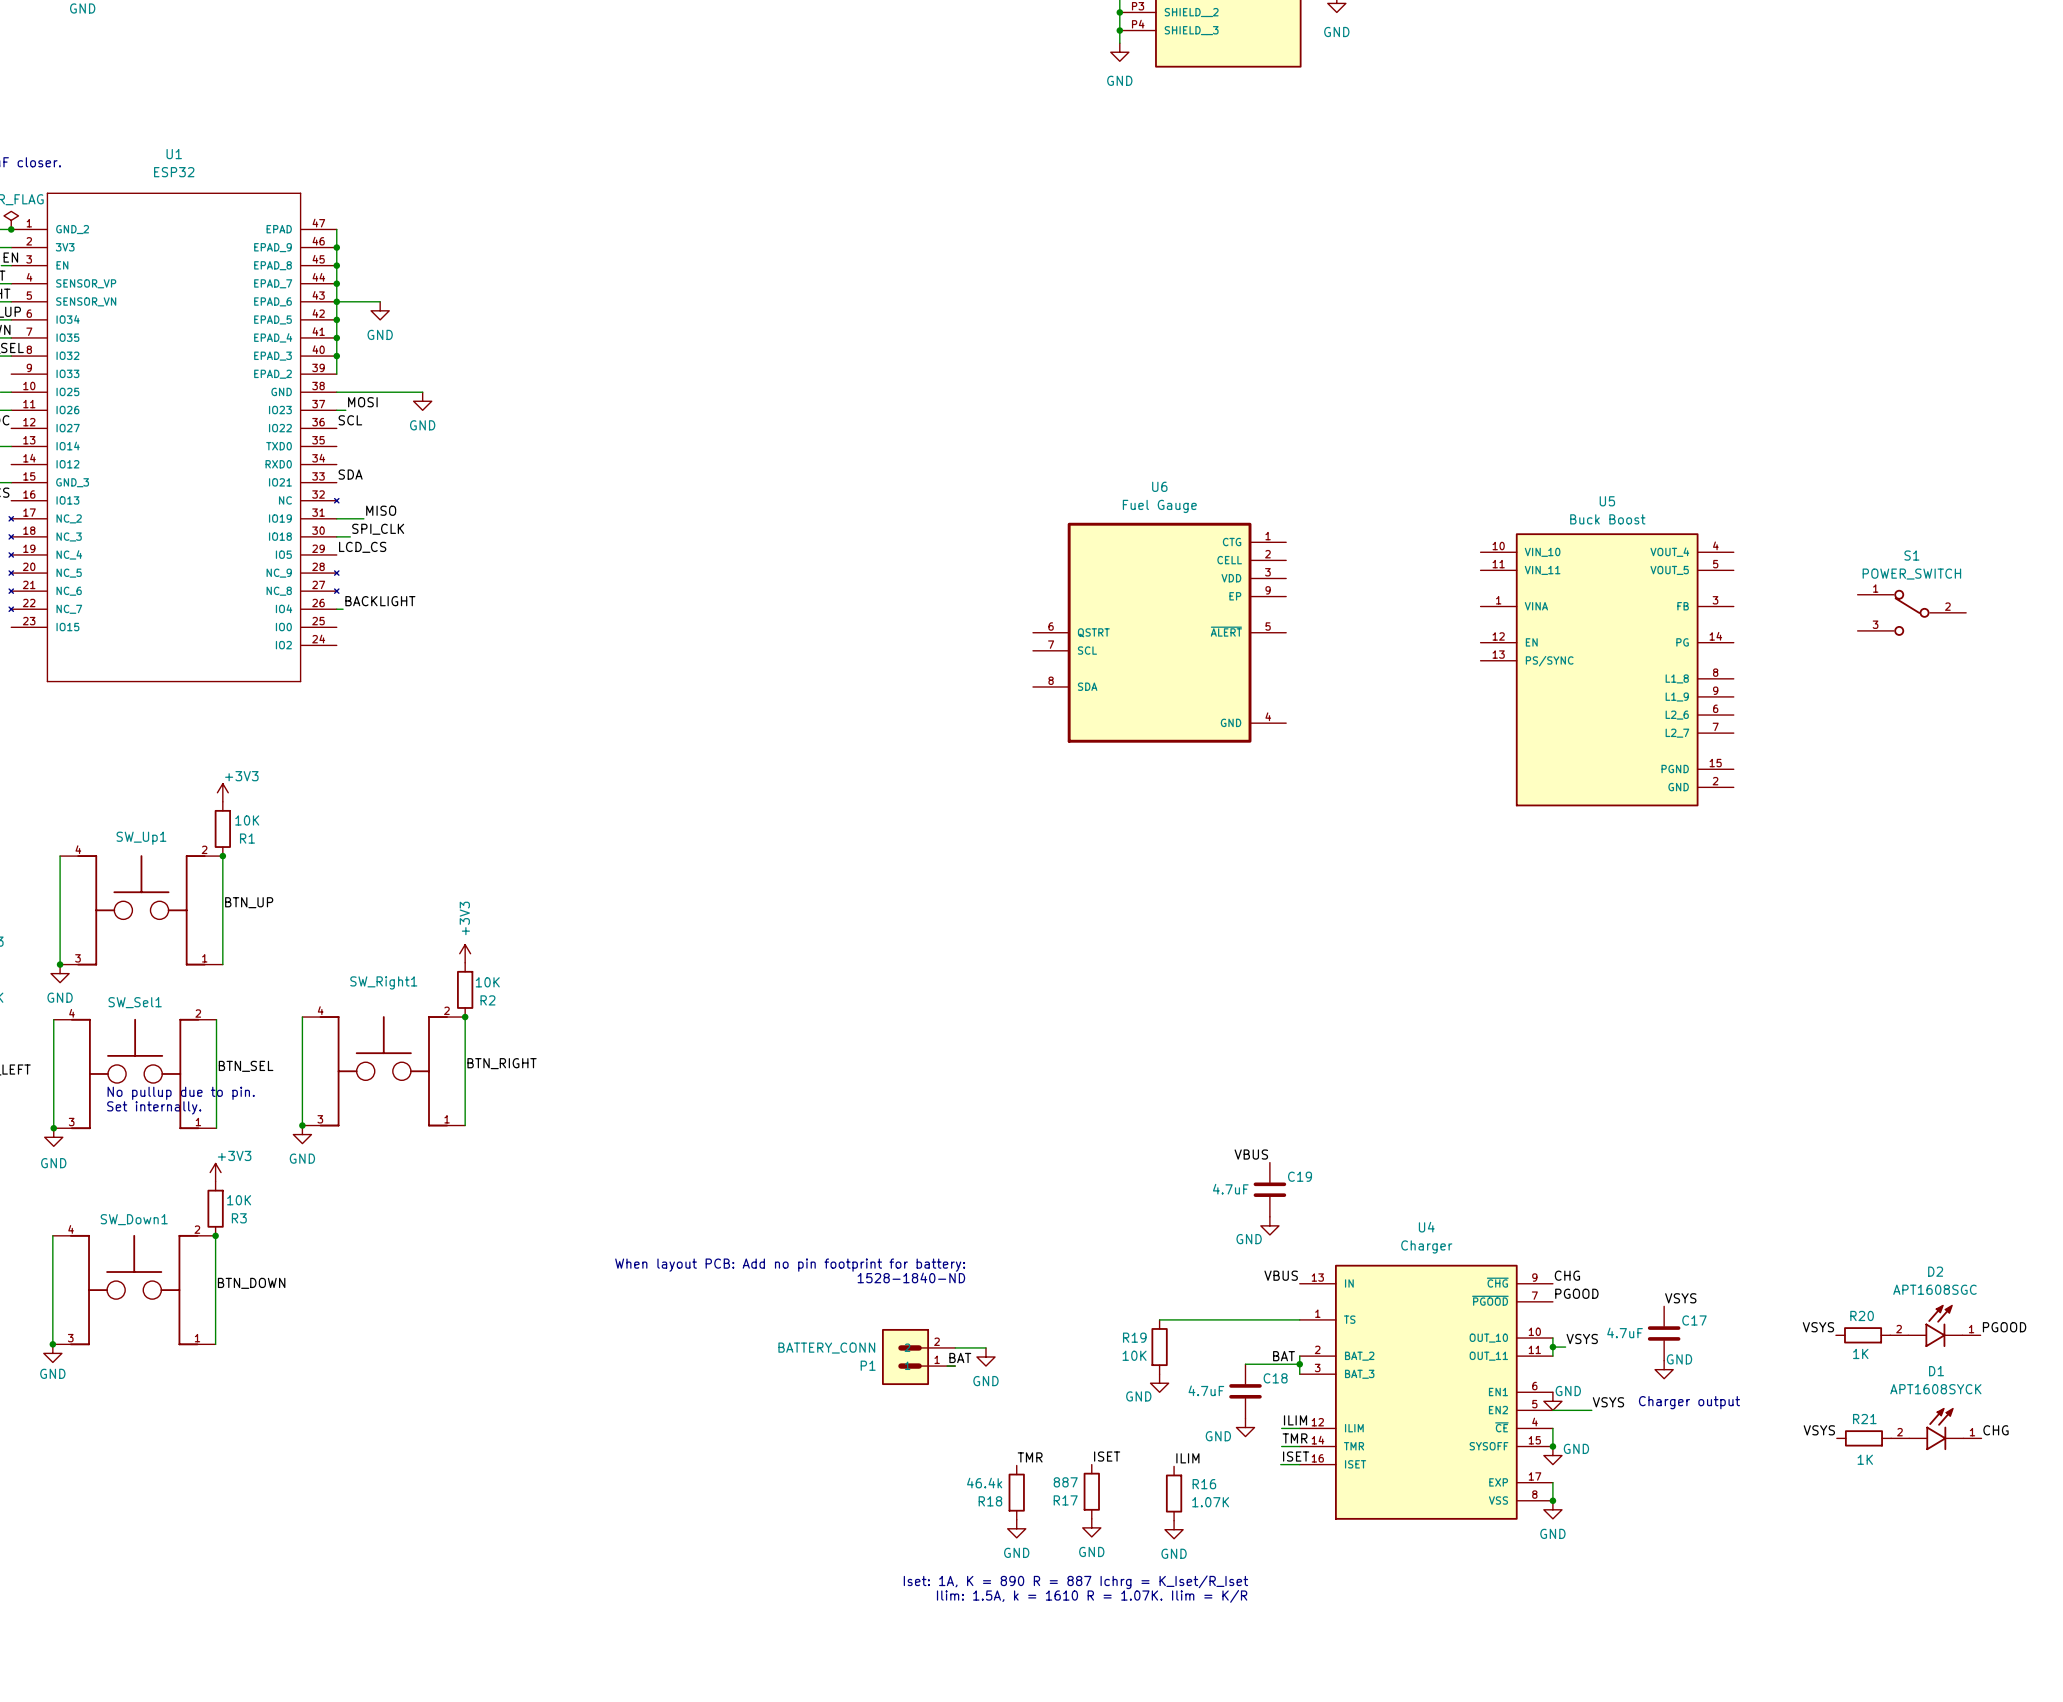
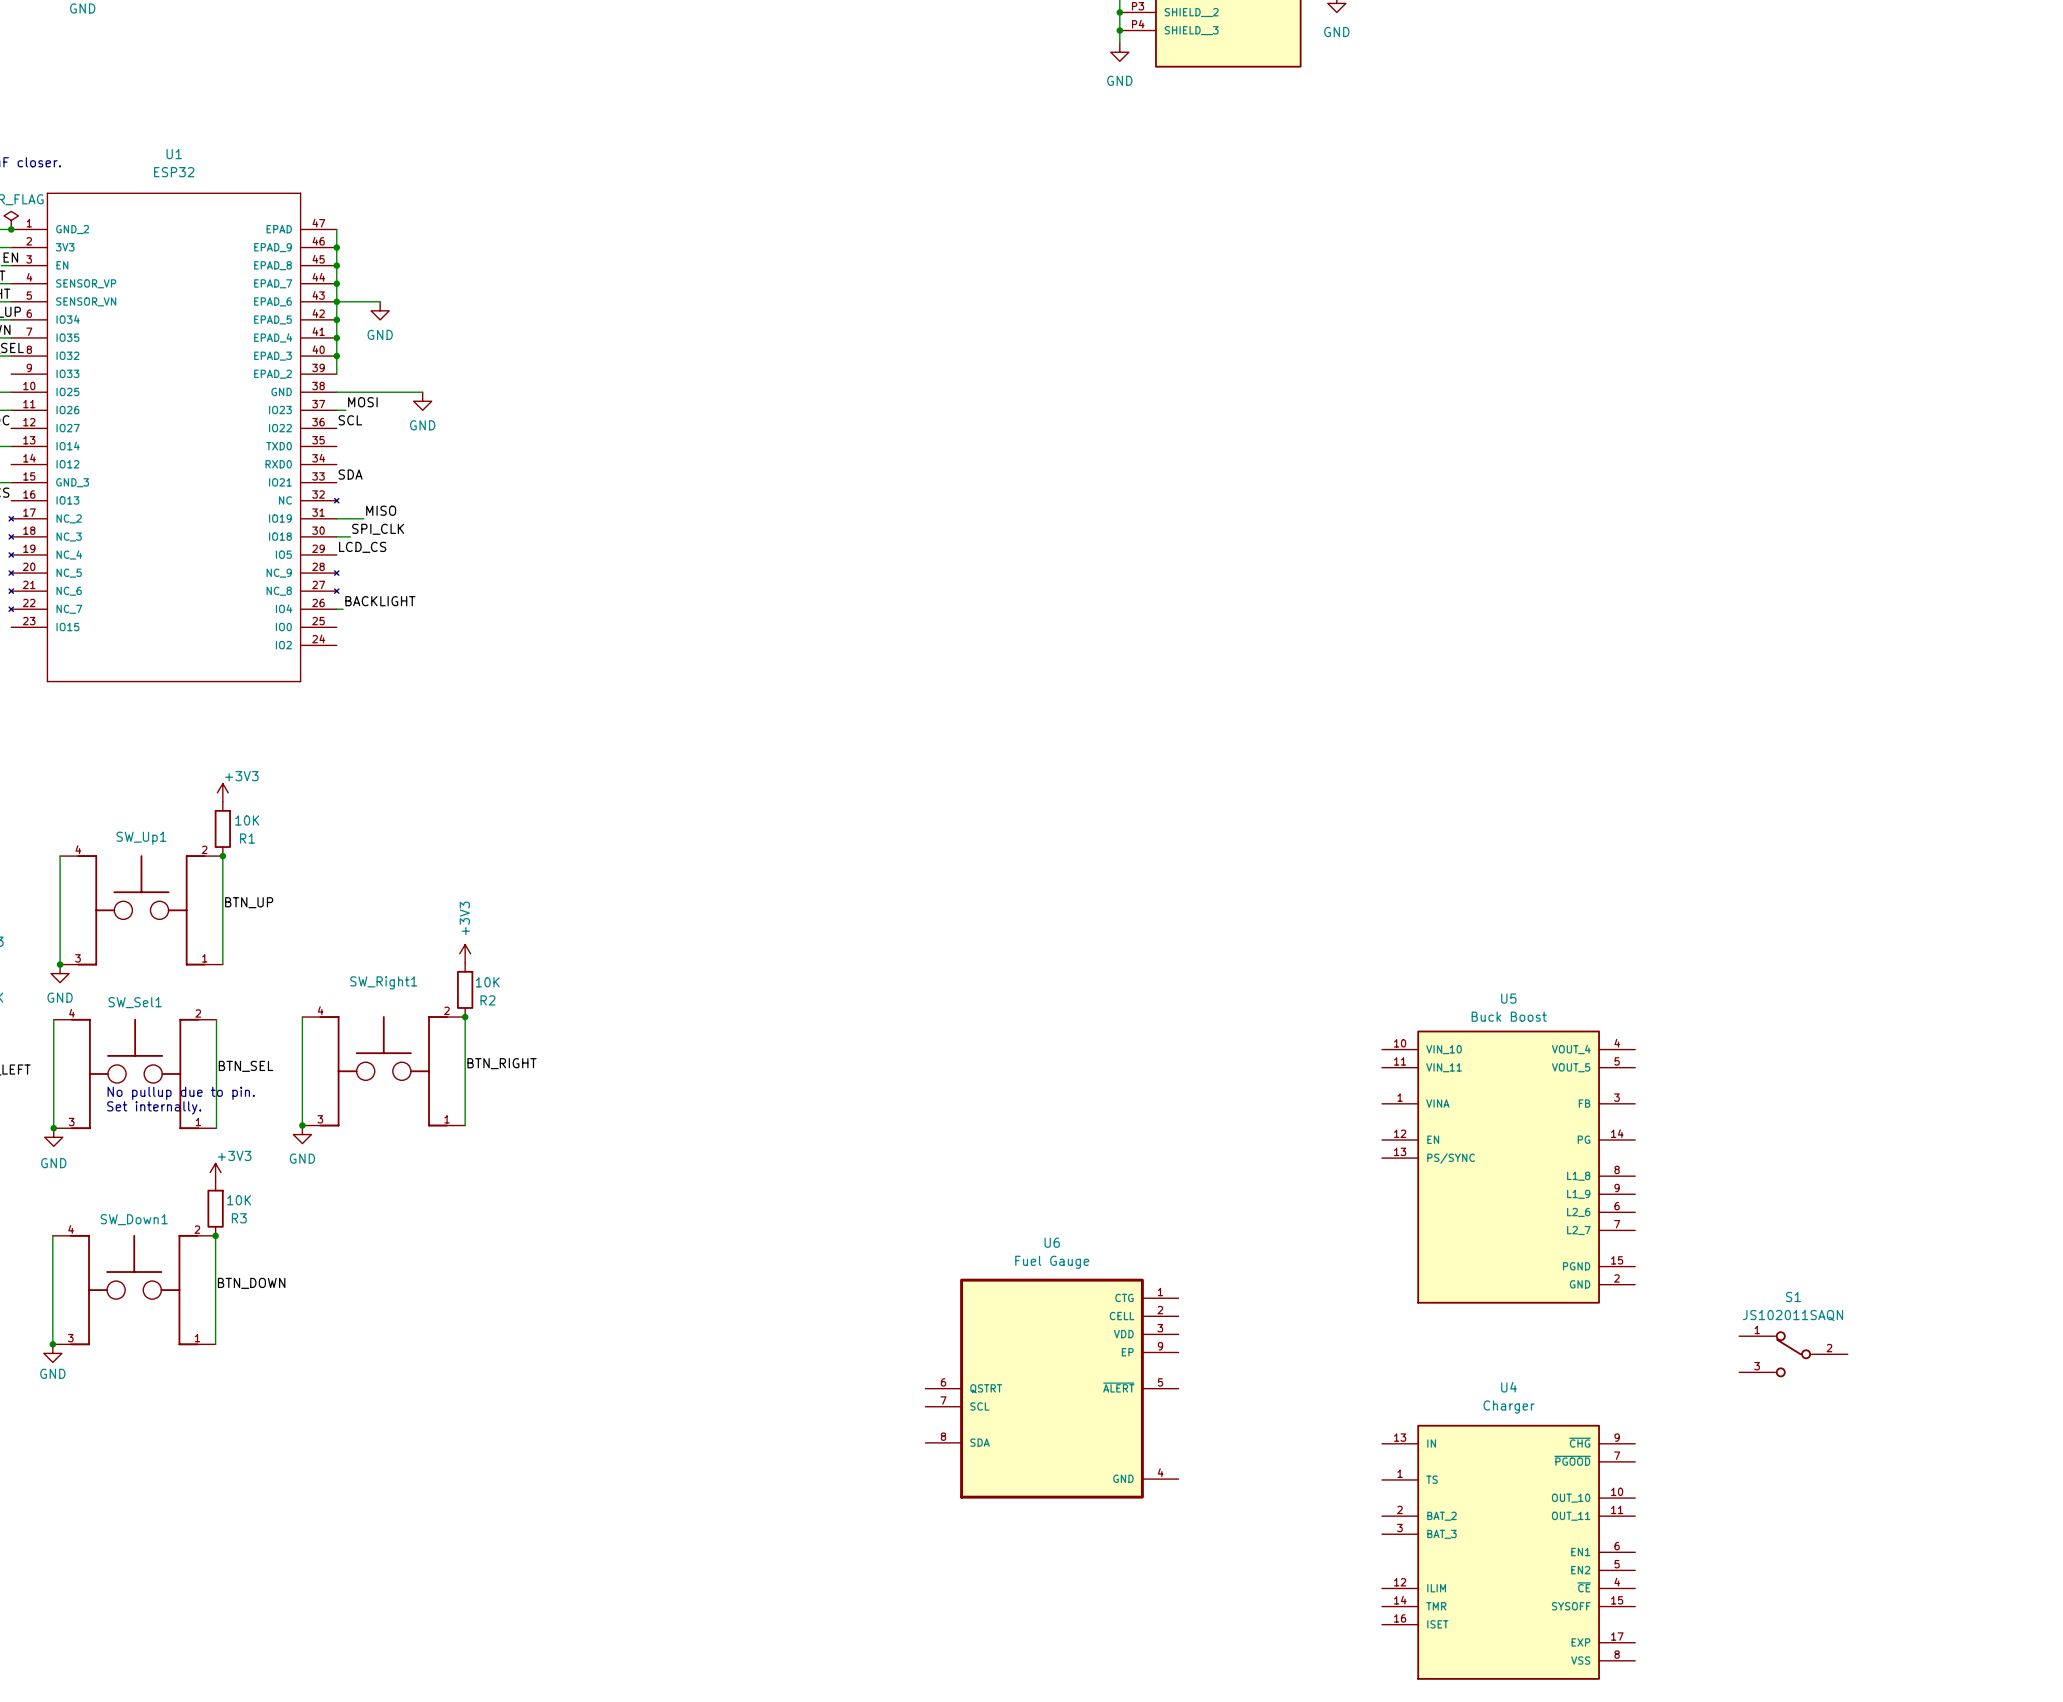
S1 value: POWER_SWITCH (1911, 574) -> JS102011SAQN (1793, 1315)
S1 position: (1911, 612) -> (1793, 1354)
U6 position: (1159, 632) -> (1051, 1388)
U5 position: (1607, 669) -> (1508, 1167)
label: VBUS (1251, 1154) -> none
C19: 4.7uF (1269, 1189) -> none
power symbol: GND (1269, 1225) -> none
text: When layout PCB: Add no pin footprint for battery: (790, 1265) -> none
label: VBUS (1281, 1275) -> none
label: CHG (1567, 1275) -> none
text: 1528-1840-ND (911, 1277) -> none
label: PGOOD (1576, 1293) -> none
label: VSYS (1680, 1298) -> none
wire: (1159, 1319) (1299, 1319) -> none
D2: APT1608SGC (1935, 1325) -> none
label: VSYS (1818, 1327) -> none
label: PGOOD (2004, 1327) -> none
C17: 4.7uF (1664, 1333) -> none
R20: 1K (1863, 1335) -> none
wire: (1552, 1338) (1552, 1356) -> none
label: VSYS (1582, 1338) -> none
R19: 10K (1159, 1347) -> none
wire: (1552, 1347) (1565, 1347) -> none
junction: (1552, 1347) -> none
label: BAT (1284, 1356) -> none
wire: (1299, 1356) (1299, 1374) -> none
P1: BATTERY_CONN (918, 1357) -> none
label: BAT (960, 1357) -> none
power symbol: GND (985, 1357) -> none
wire: (1245, 1364) (1299, 1364) -> none
junction: (1299, 1364) -> none
wire: (947, 1366) (955, 1366) -> none
power symbol: GND (1664, 1369) -> none
power symbol: GND (1159, 1383) -> none
C18: 4.7uF (1245, 1391) -> none
U4 position: (1426, 1392) -> (1508, 1552)
power symbol: GND (1552, 1401) -> none
label: VSYS (1608, 1402) -> none
text: Charger output (1689, 1402) -> none
wire: (1552, 1410) (1591, 1410) -> none
label: ILIM (1295, 1420) -> none
power symbol: GND (1245, 1427) -> none
wire: (1281, 1428) (1299, 1428) -> none
D1: APT1608SYCK (1936, 1429) -> none
label: VSYS (1819, 1430) -> none
label: CHG (1996, 1430) -> none
label: TMR (1295, 1438) -> none
R21: 1K (1863, 1438) -> none
wire: (1281, 1446) (1299, 1446) -> none
junction: (1552, 1446) -> none
power symbol: GND (1552, 1455) -> none
label: ISET (1107, 1456) -> none
label: ISET (1296, 1456) -> none
label: TMR (1030, 1457) -> none
label: ILIM (1187, 1458) -> none
wire: (1280, 1464) (1299, 1464) -> none
R17: 887 (1091, 1491) -> none
R18: 46.4k (1016, 1492) -> none
R16: 1.07K (1174, 1493) -> none
junction: (1552, 1500) -> none
power symbol: GND (1552, 1509) -> none
power symbol: GND (1091, 1527) -> none
power symbol: GND (1016, 1528) -> none
power symbol: GND (1174, 1529) -> none
text: Iset: 1A, K = 890 R = 887 Ichrg = K_Iset/R_Iset (1075, 1582) -> none
text: Ilim: 1.5A, k = 1610 R = 1.07K. Ilim = K/R (1092, 1596) -> none

